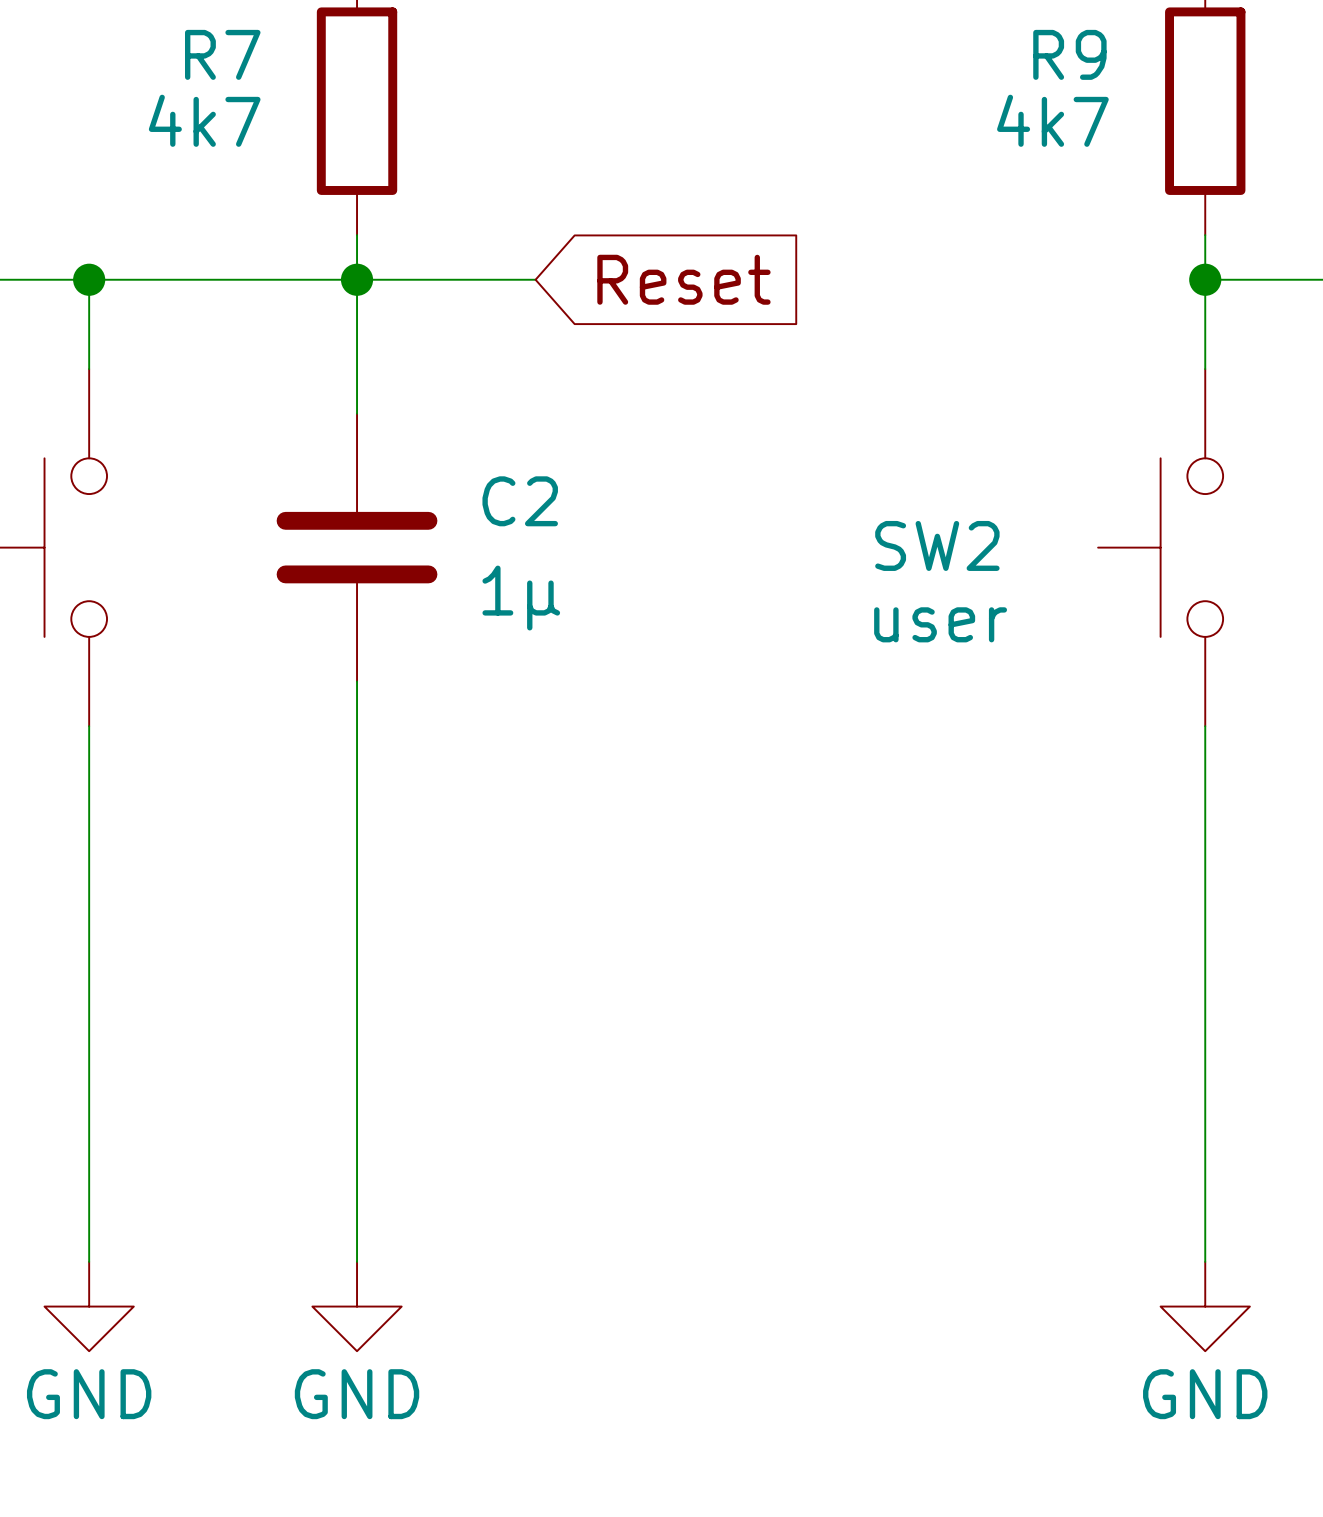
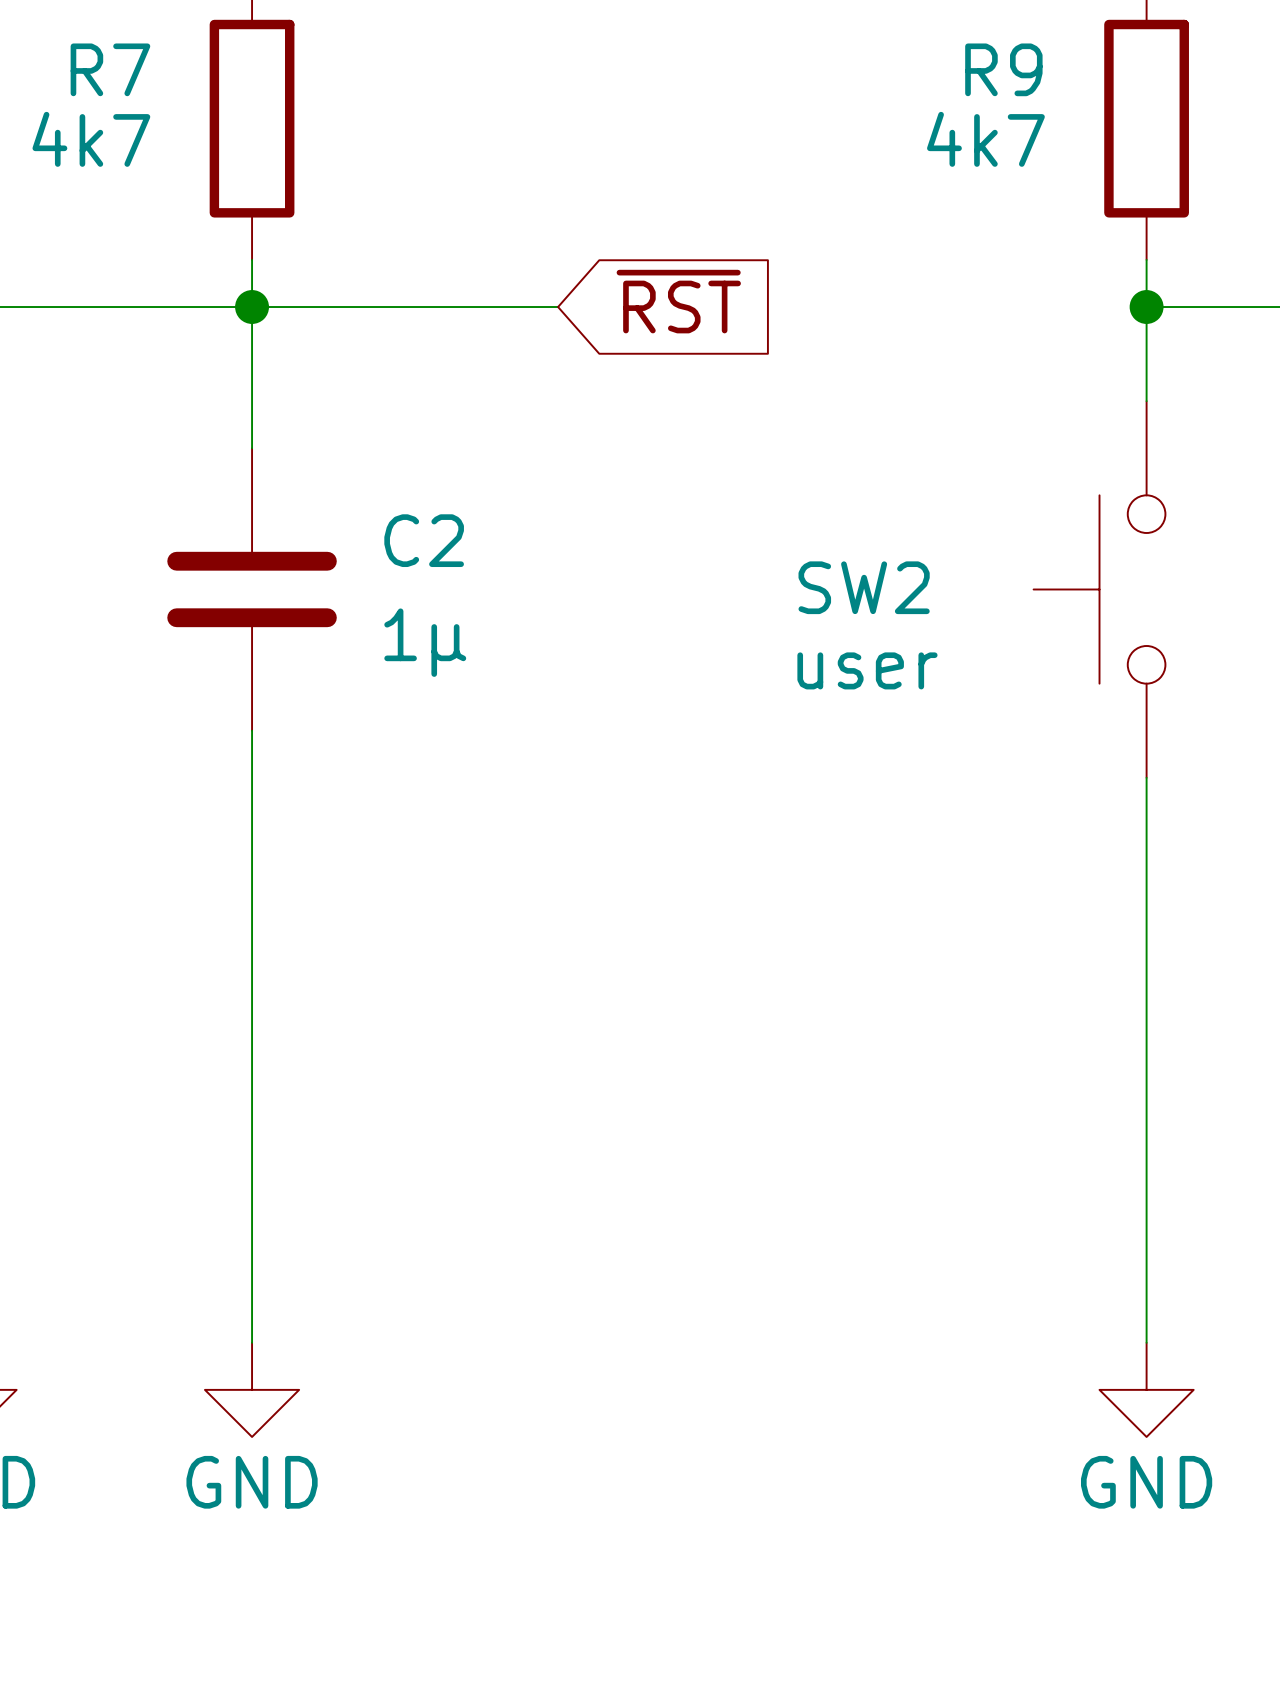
global label: none -> ~{RST} (678, 301)
wire: none -> (440, 307) (558, 307)
global label: Reset (683, 279) -> none

